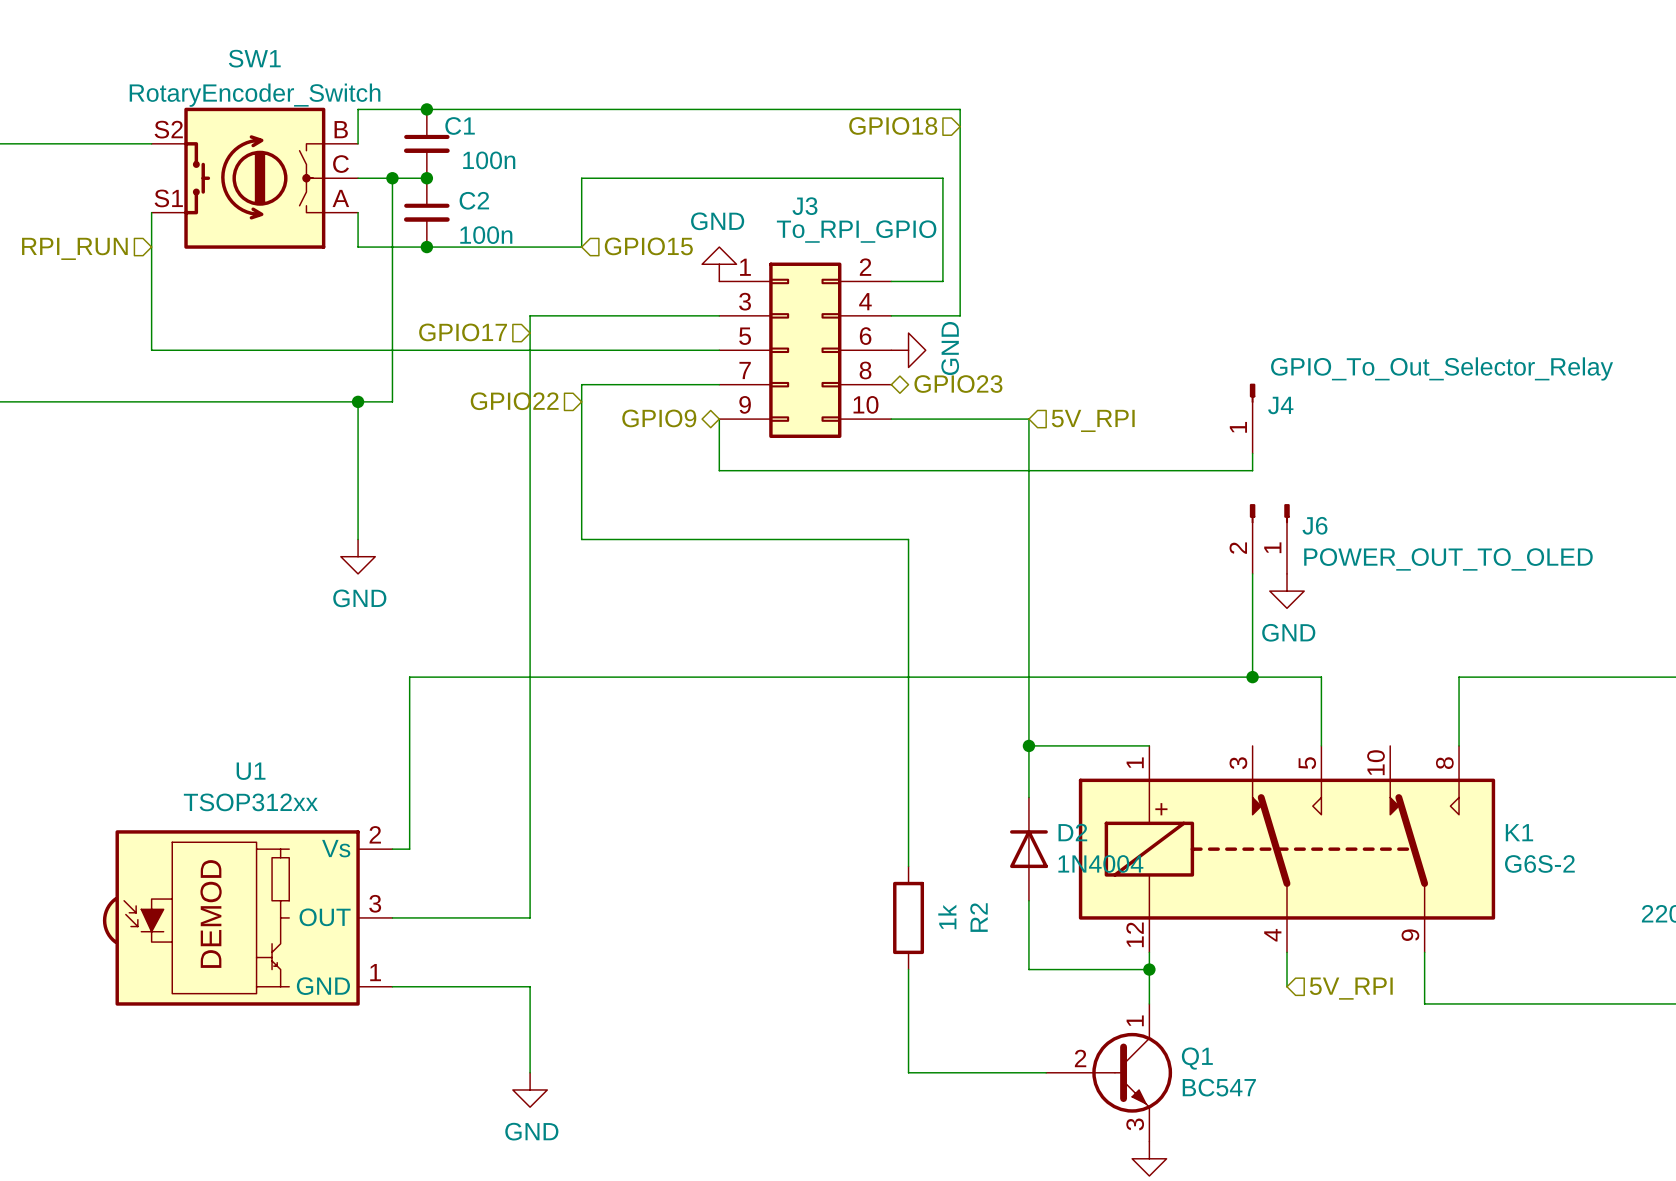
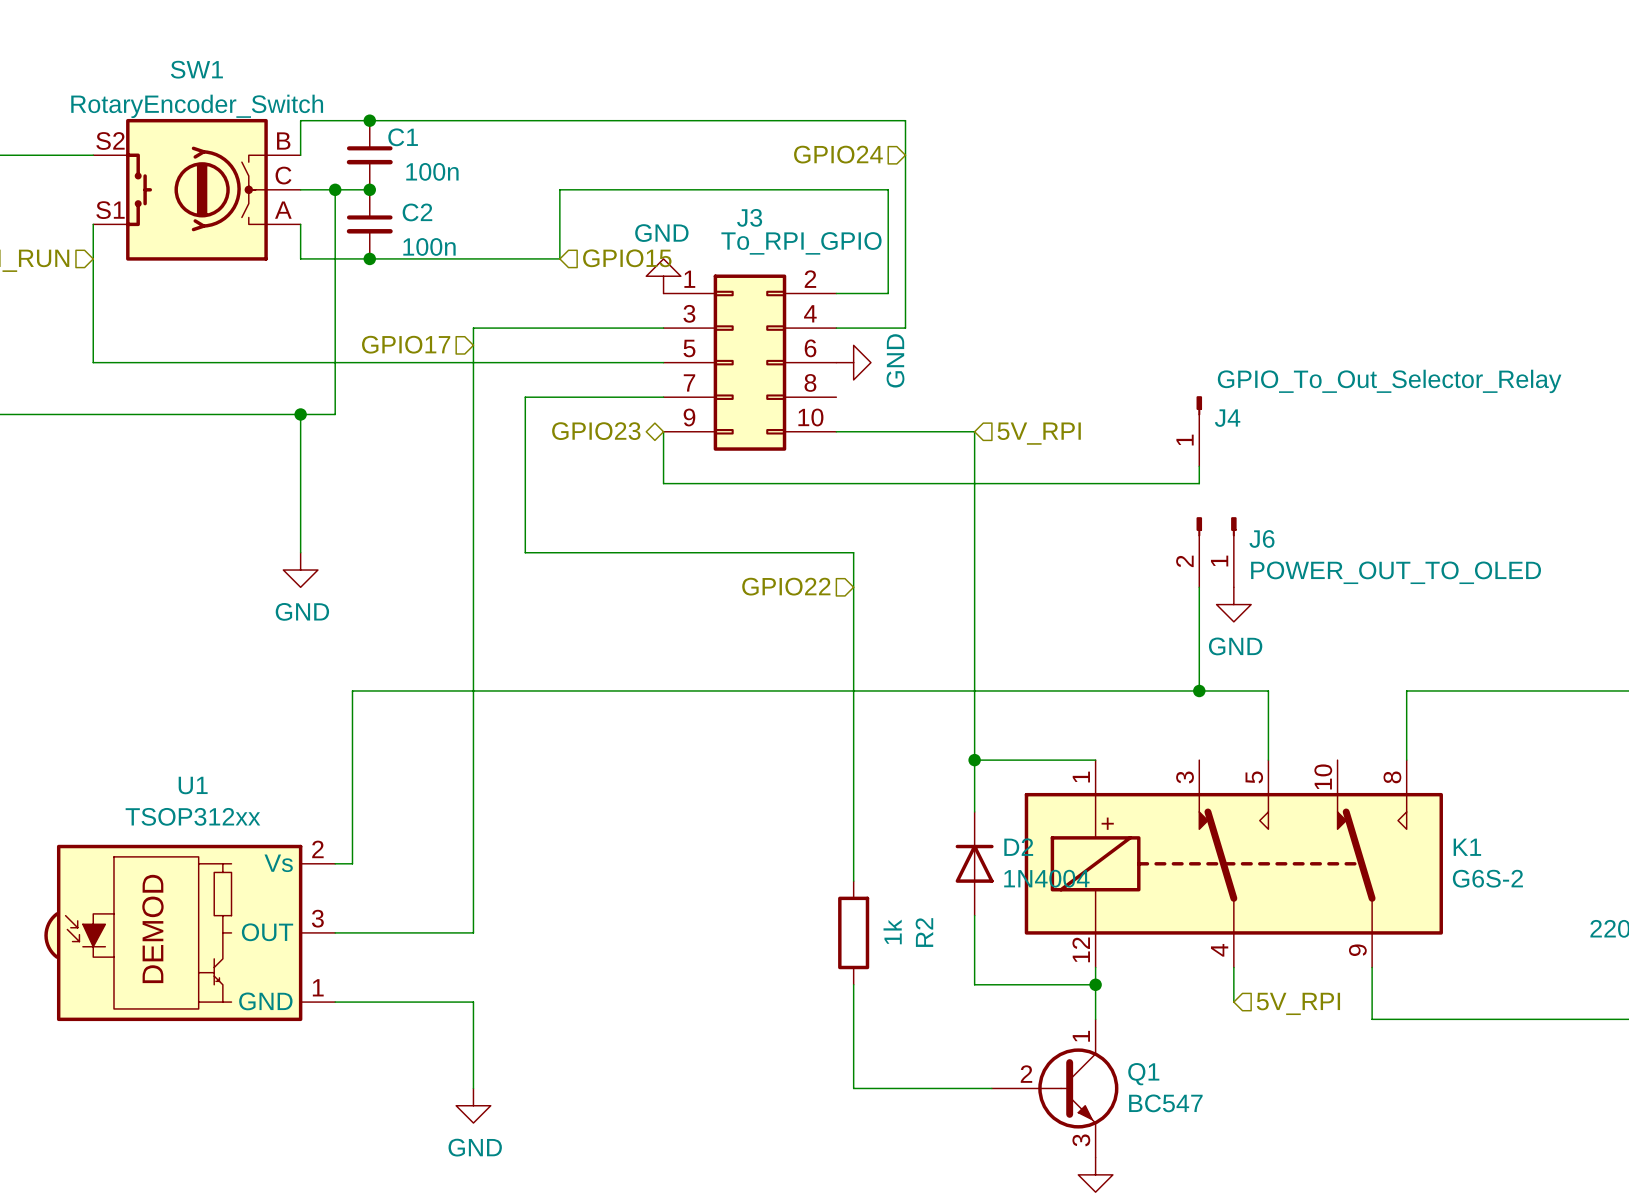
SW1 symbol: [151, 107, 359, 249] -> [93, 118, 301, 261]
hierarchical label: GPIO18 (893, 125) -> GPIO24 (838, 154)
wire: (616, 178) (581, 178) (581, 247) -> (559, 189) (559, 258) (525, 258)
hierarchical label position: GPIO15 (648, 246) -> GPIO15 (627, 258)
hierarchical label: GPIO23 (958, 384) -> none
hierarchical label: GPIO22 (514, 401) -> none
hierarchical label: GPIO9 (659, 418) -> GPIO23 (596, 431)
hierarchical label: none -> GPIO22 (786, 586)

